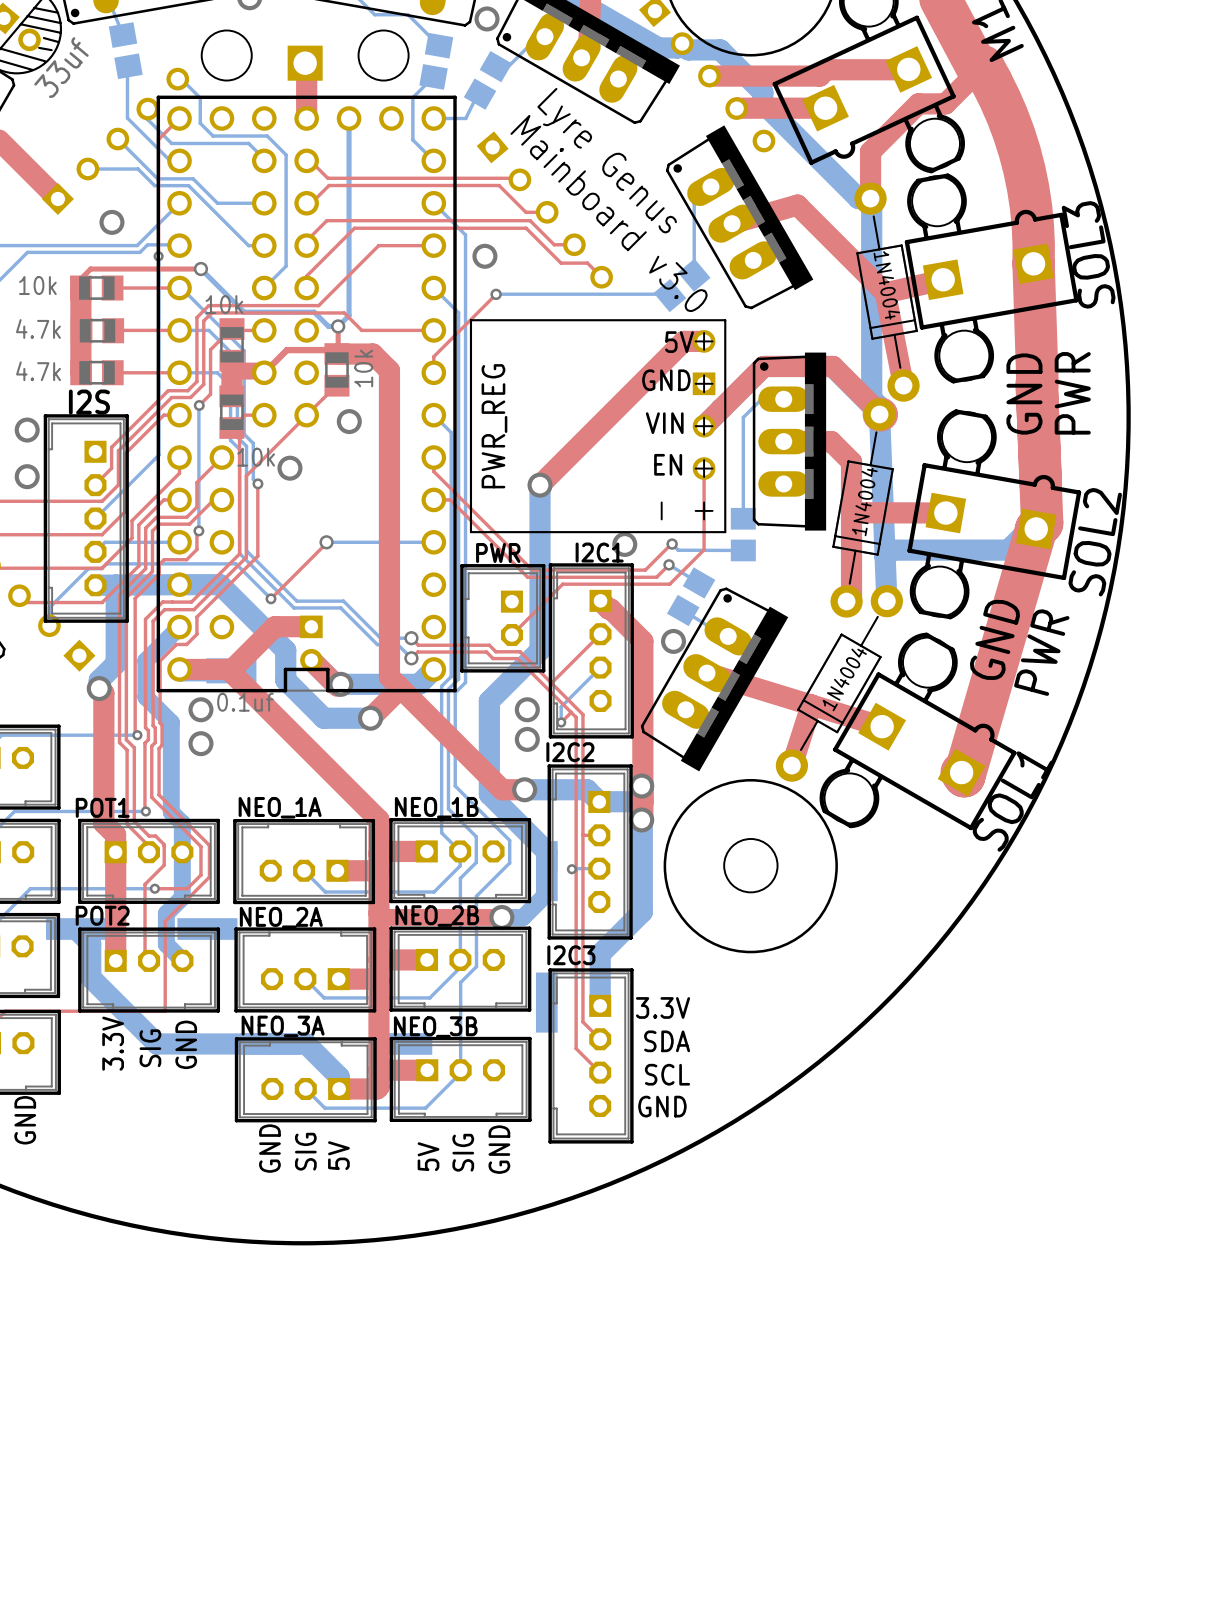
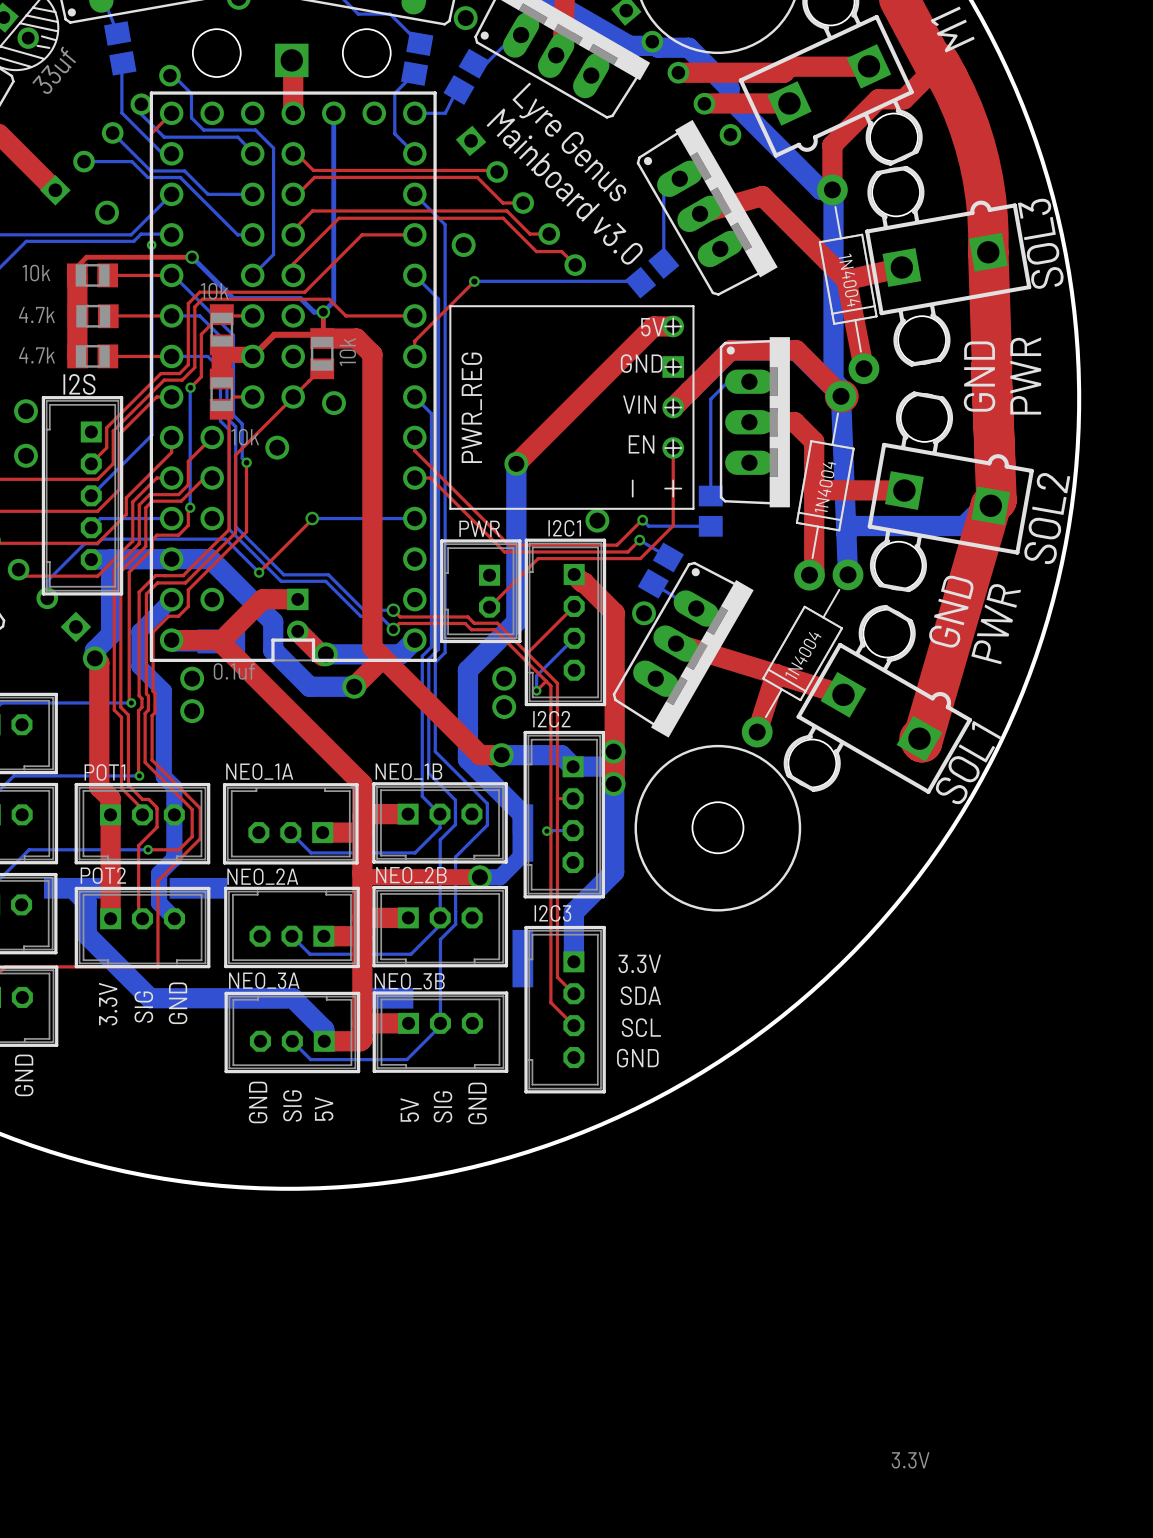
text: none -> 3.3V (910, 1460)

